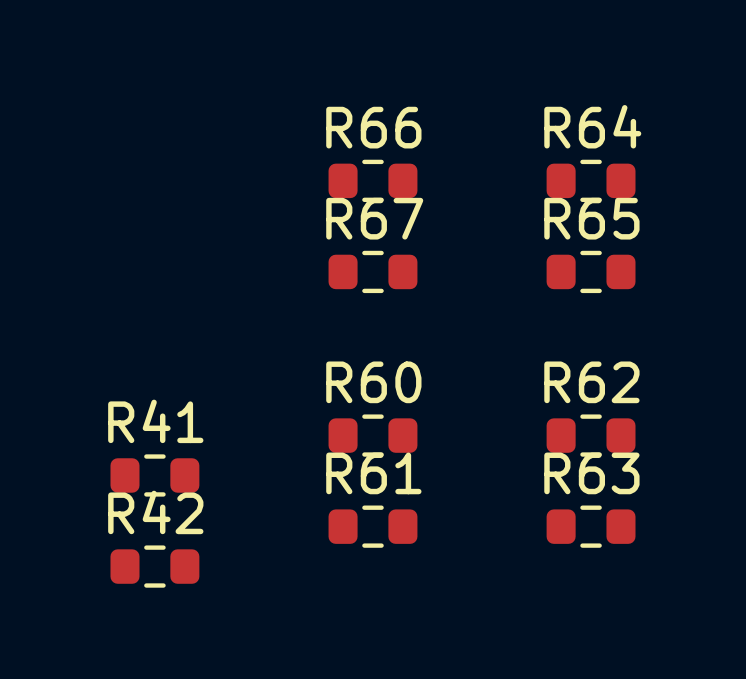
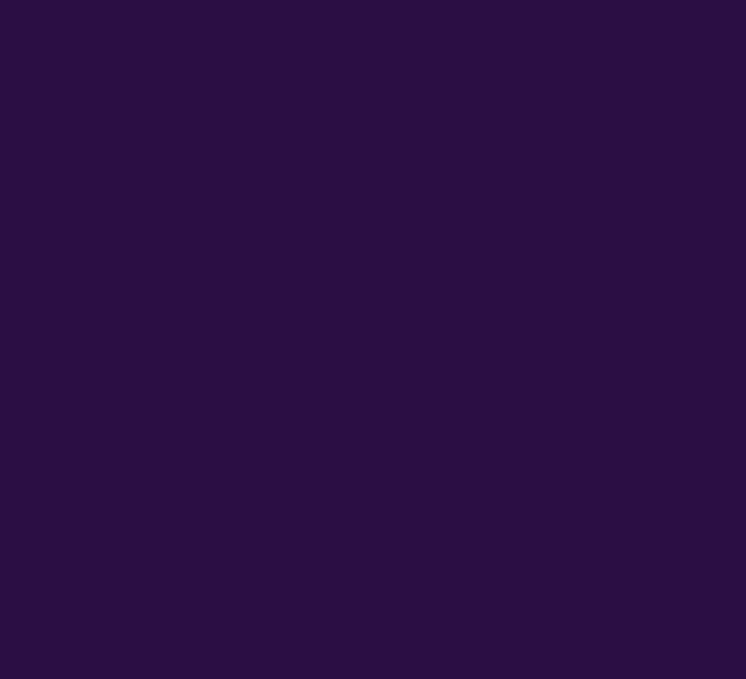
R66: (372, 180) -> none
R64: (591, 180) -> none
R67: (372, 271) -> none
R65: (591, 271) -> none
R60: (372, 435) -> none
R62: (591, 435) -> none
R41: (154, 475) -> none
R61: (372, 526) -> none
R63: (591, 526) -> none
R42: (154, 566) -> none

